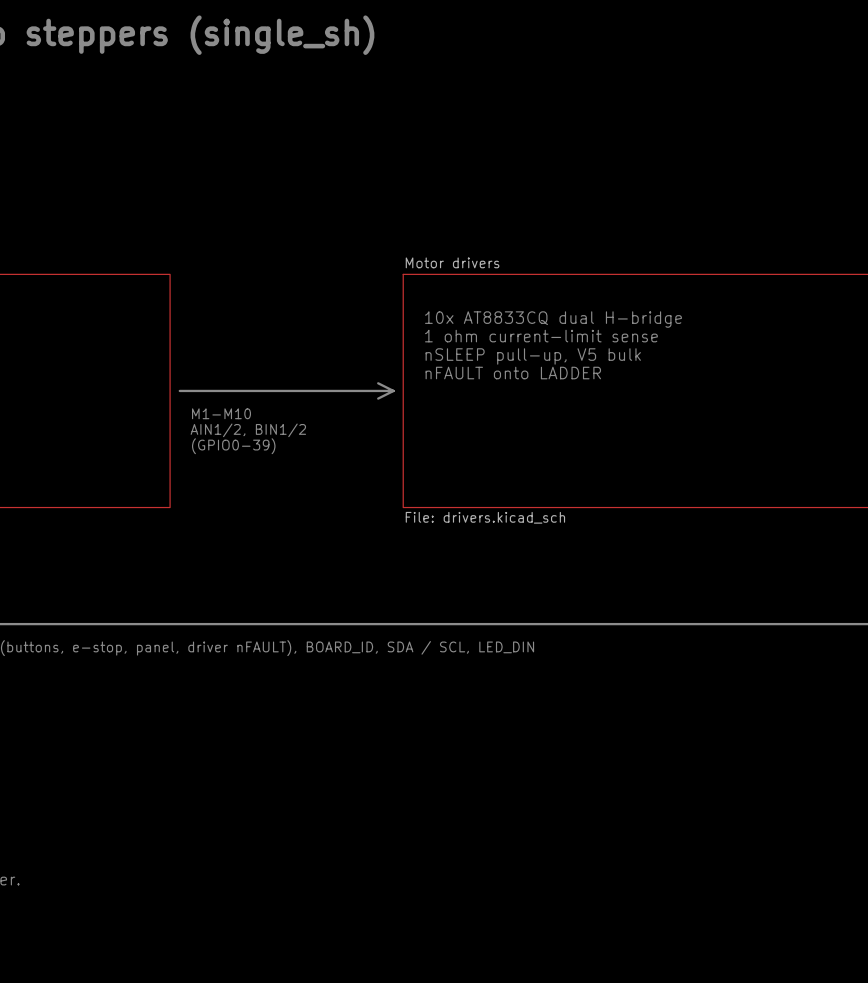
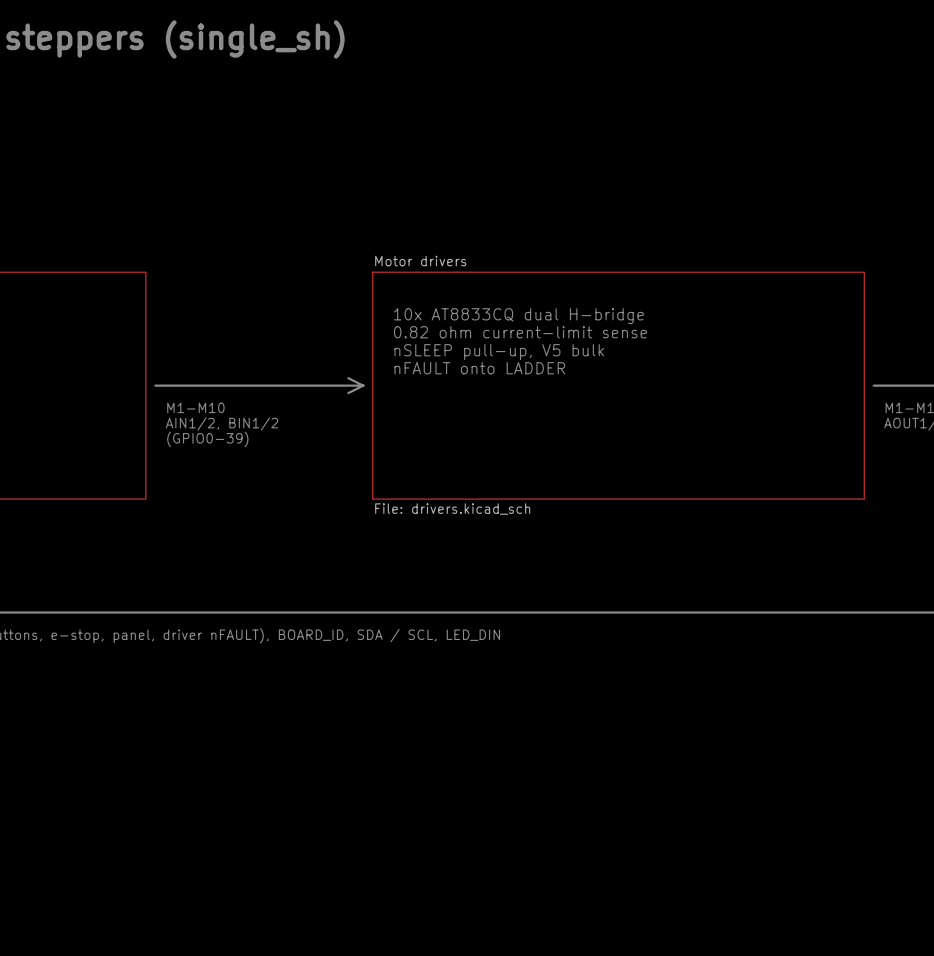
text: 1 ohm current-limit sense (541, 336) -> 0.82 ohm current-limit sense (520, 332)

